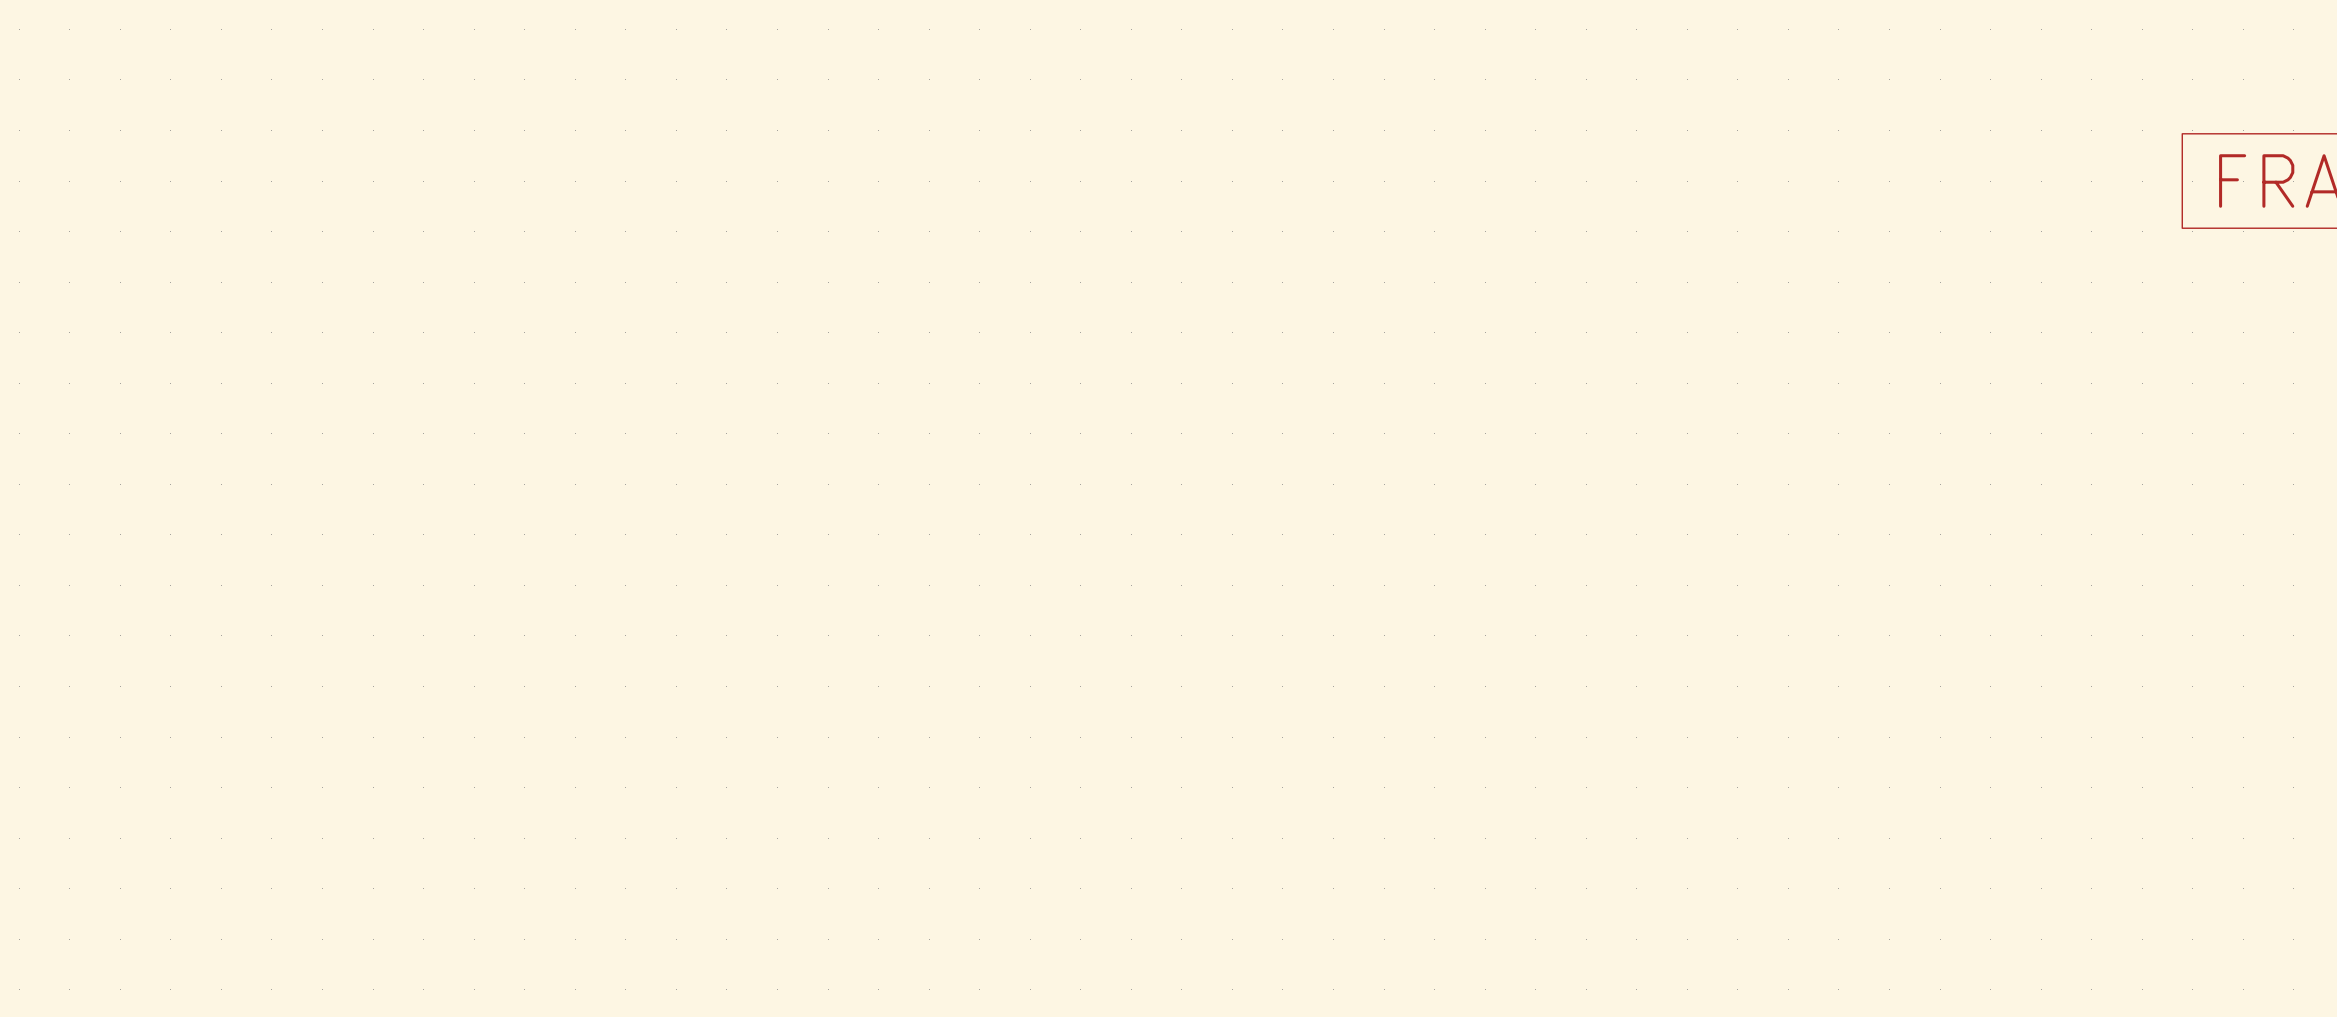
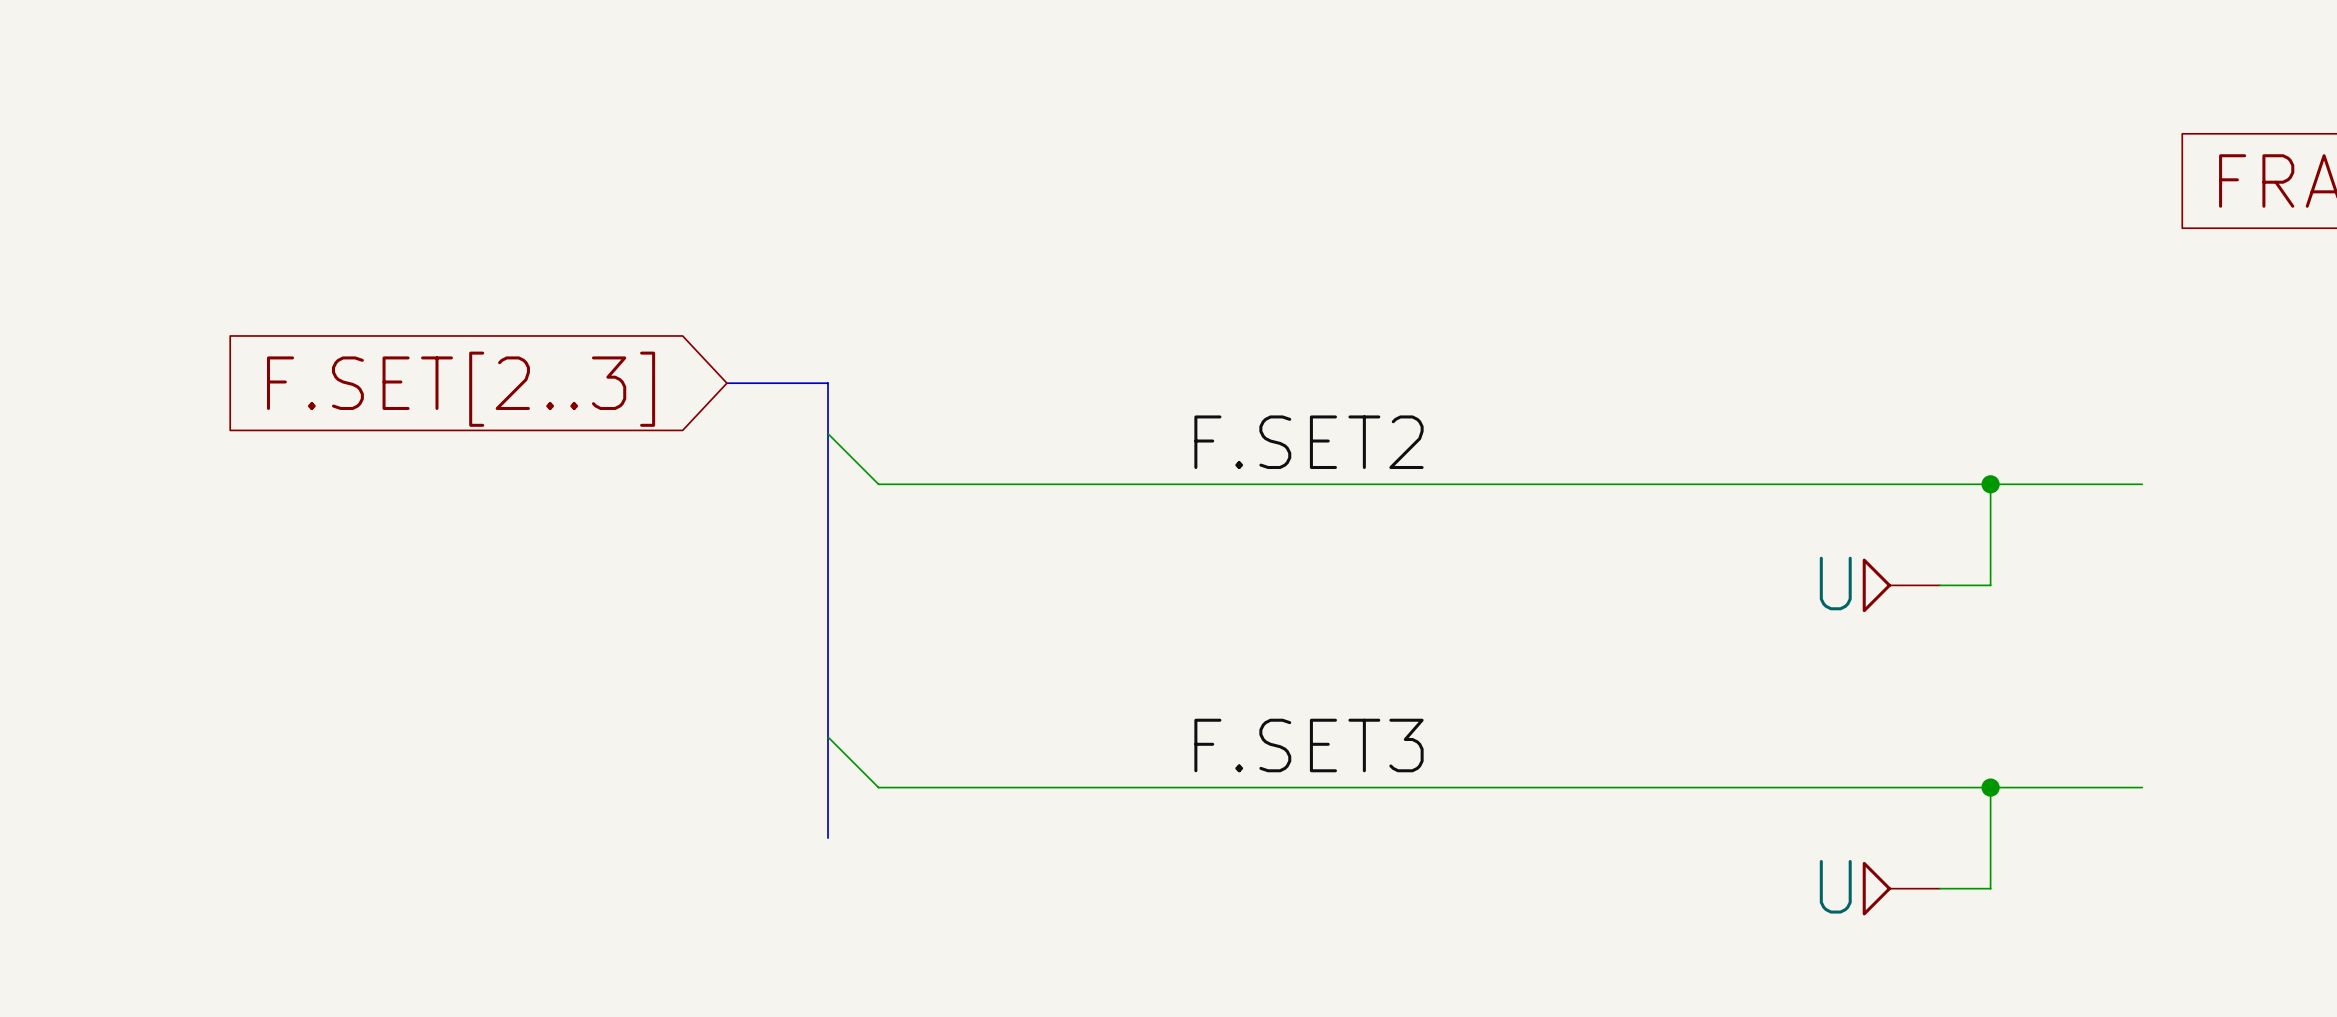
bus: none -> (726, 383) (828, 383) (828, 838)
global label: none -> F.SET[2..3] (461, 389)
wire: none -> (828, 433) (878, 484) (2142, 484)
label: none -> F.SET2 (1309, 442)
wire: none -> (1990, 484) (1990, 585) (1940, 585)
junction: none -> (1990, 484)
U: none -> (1901, 585)
wire: none -> (828, 737) (878, 787) (2142, 787)
label: none -> F.SET3 (1309, 745)
wire: none -> (1990, 787) (1990, 888) (1940, 888)
junction: none -> (1990, 787)
U: none -> (1901, 888)

